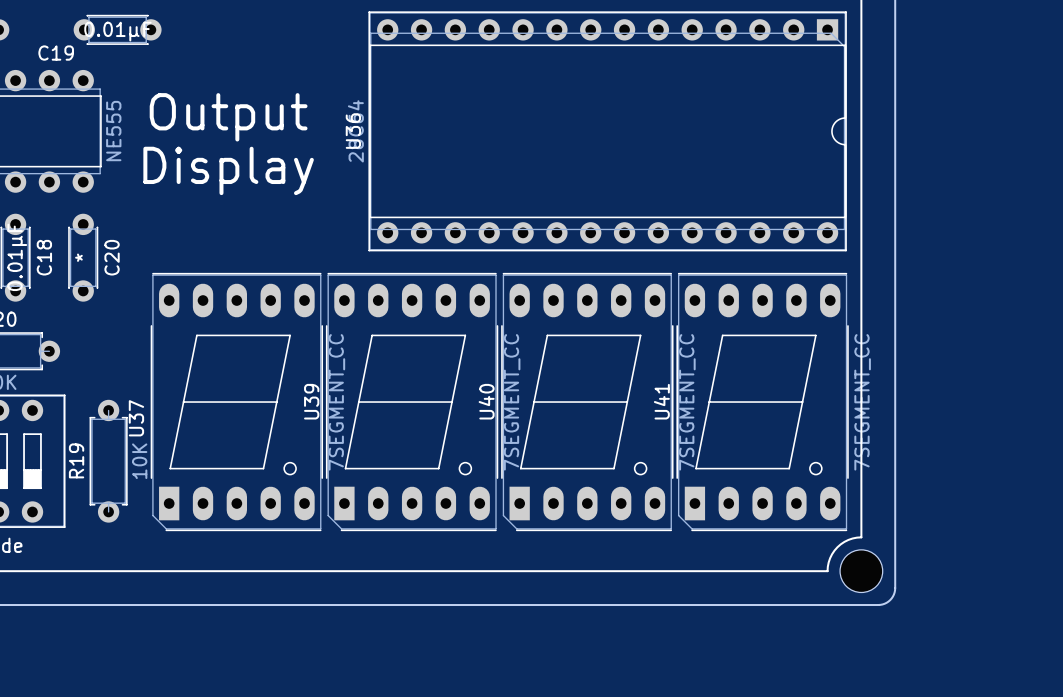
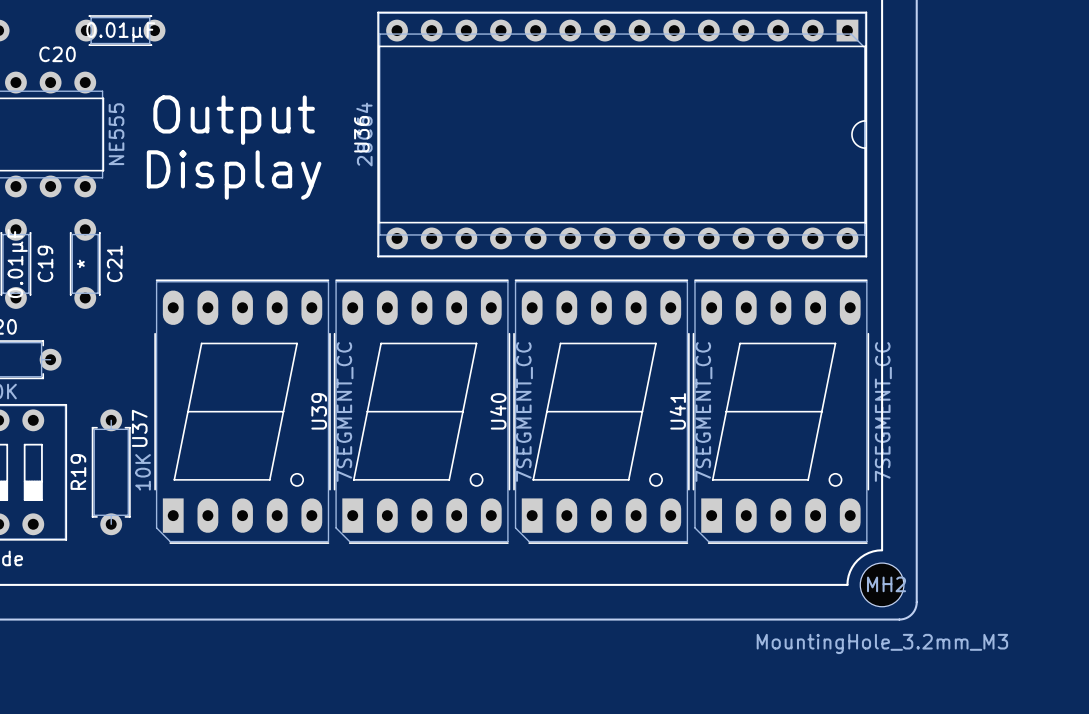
C19 name: C19 (56, 53) -> C20 (57, 54)
C18 name: C18 (44, 257) -> C19 (45, 263)
C20 name: C20 (112, 257) -> C21 (114, 263)
MH2 name: none -> MH2 (886, 584)
MH2 value: none -> MountingHole_3.2mm_M3 (882, 643)

